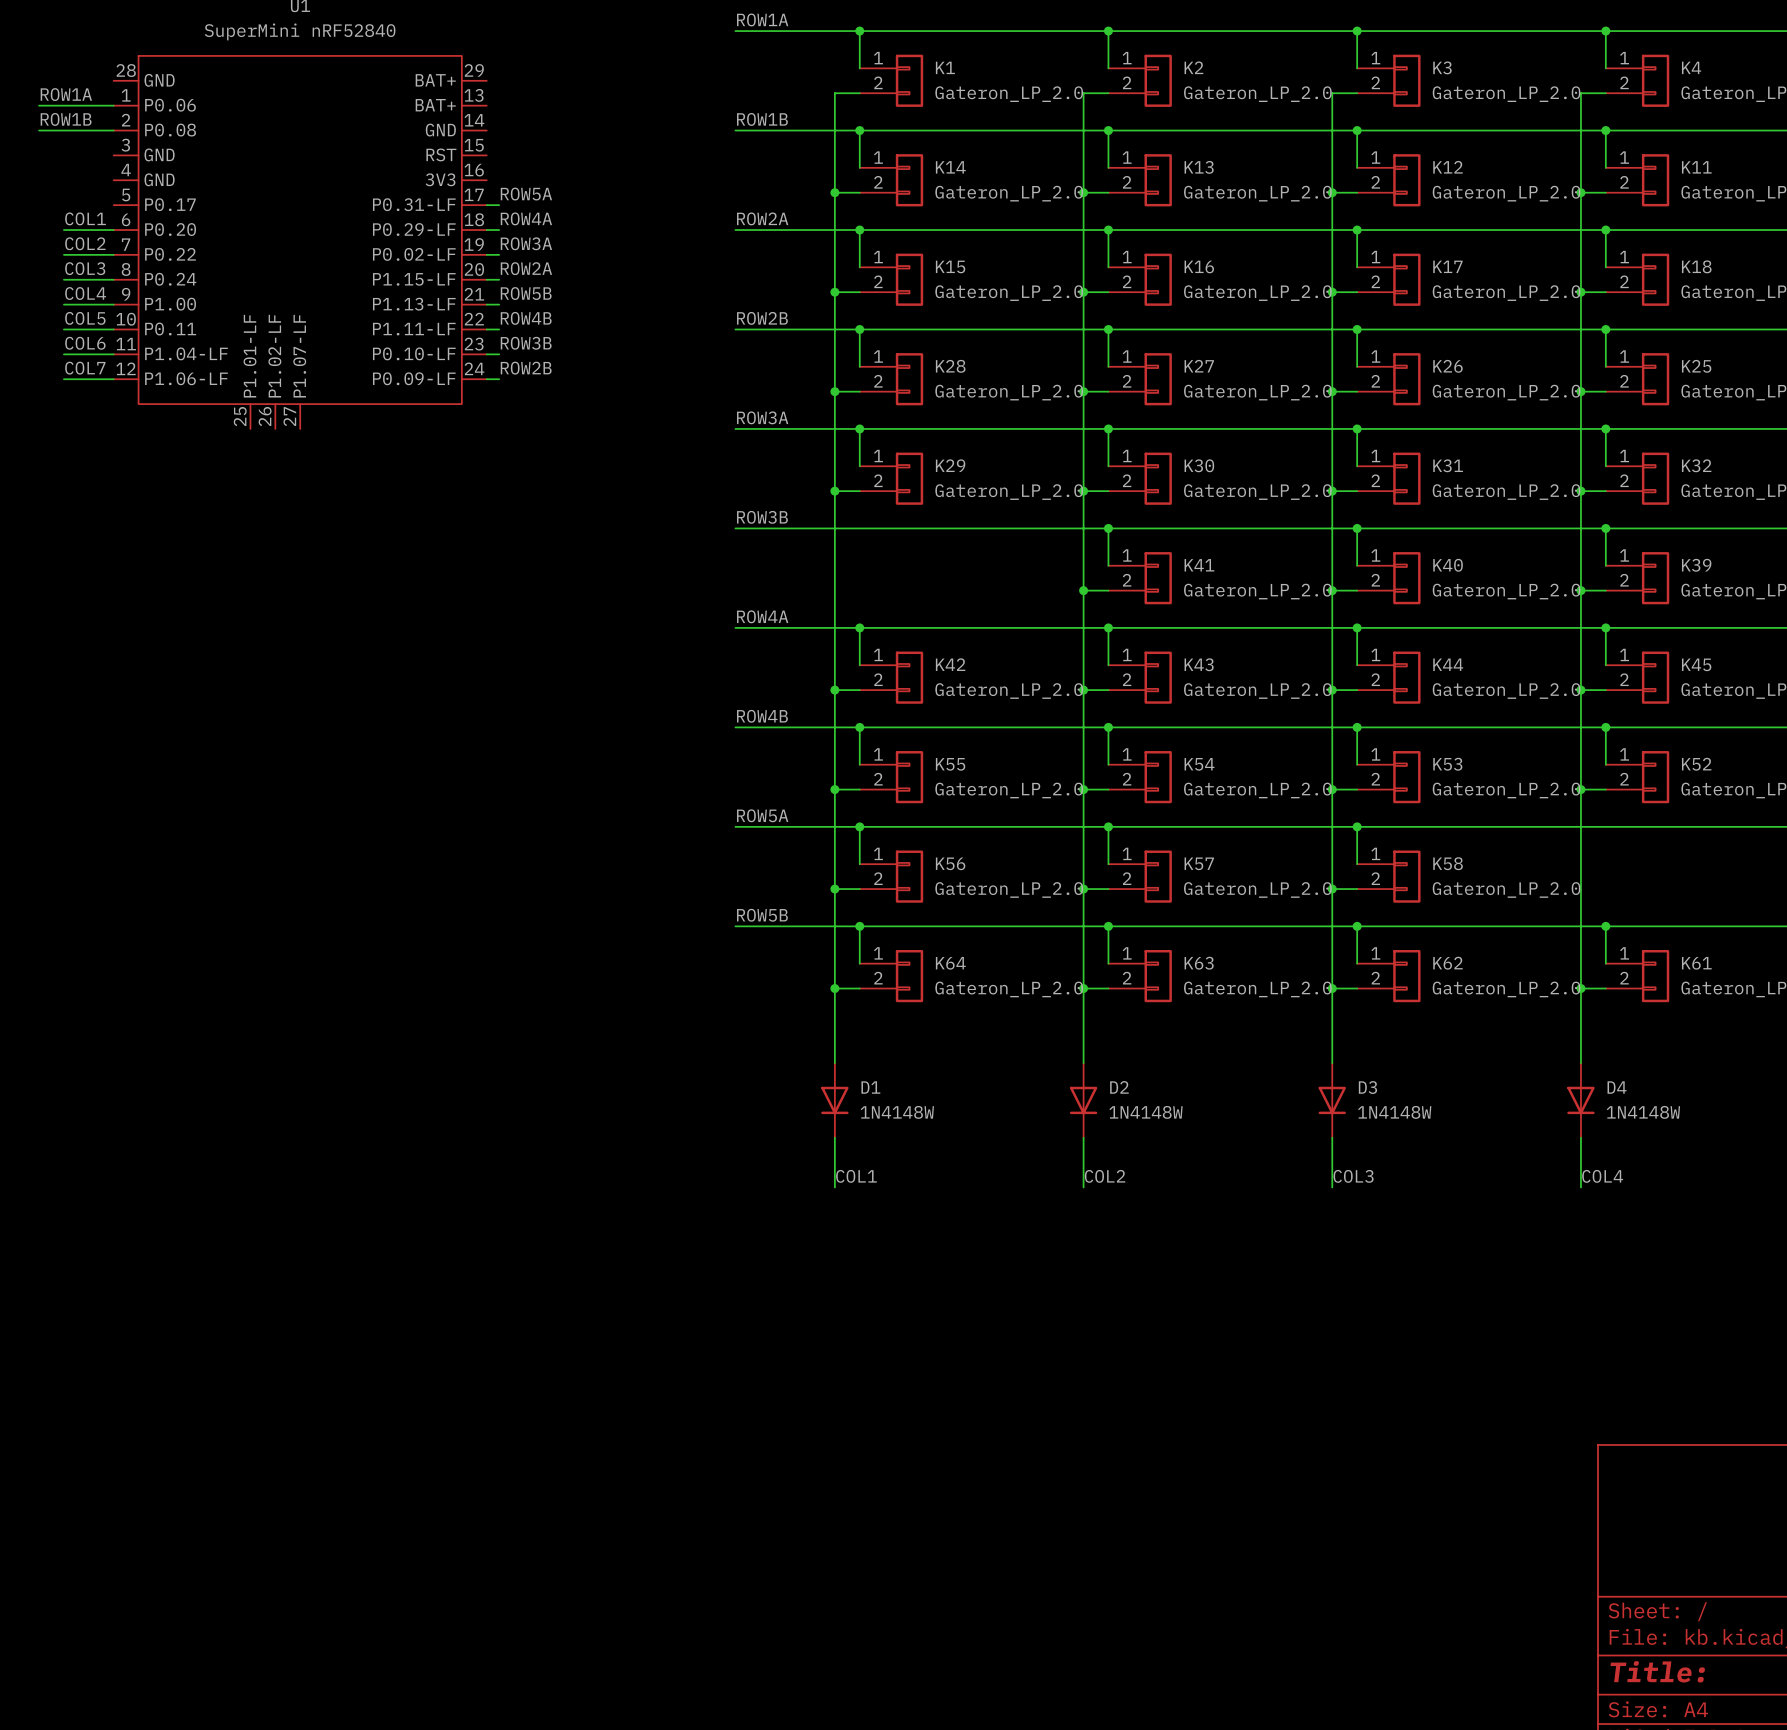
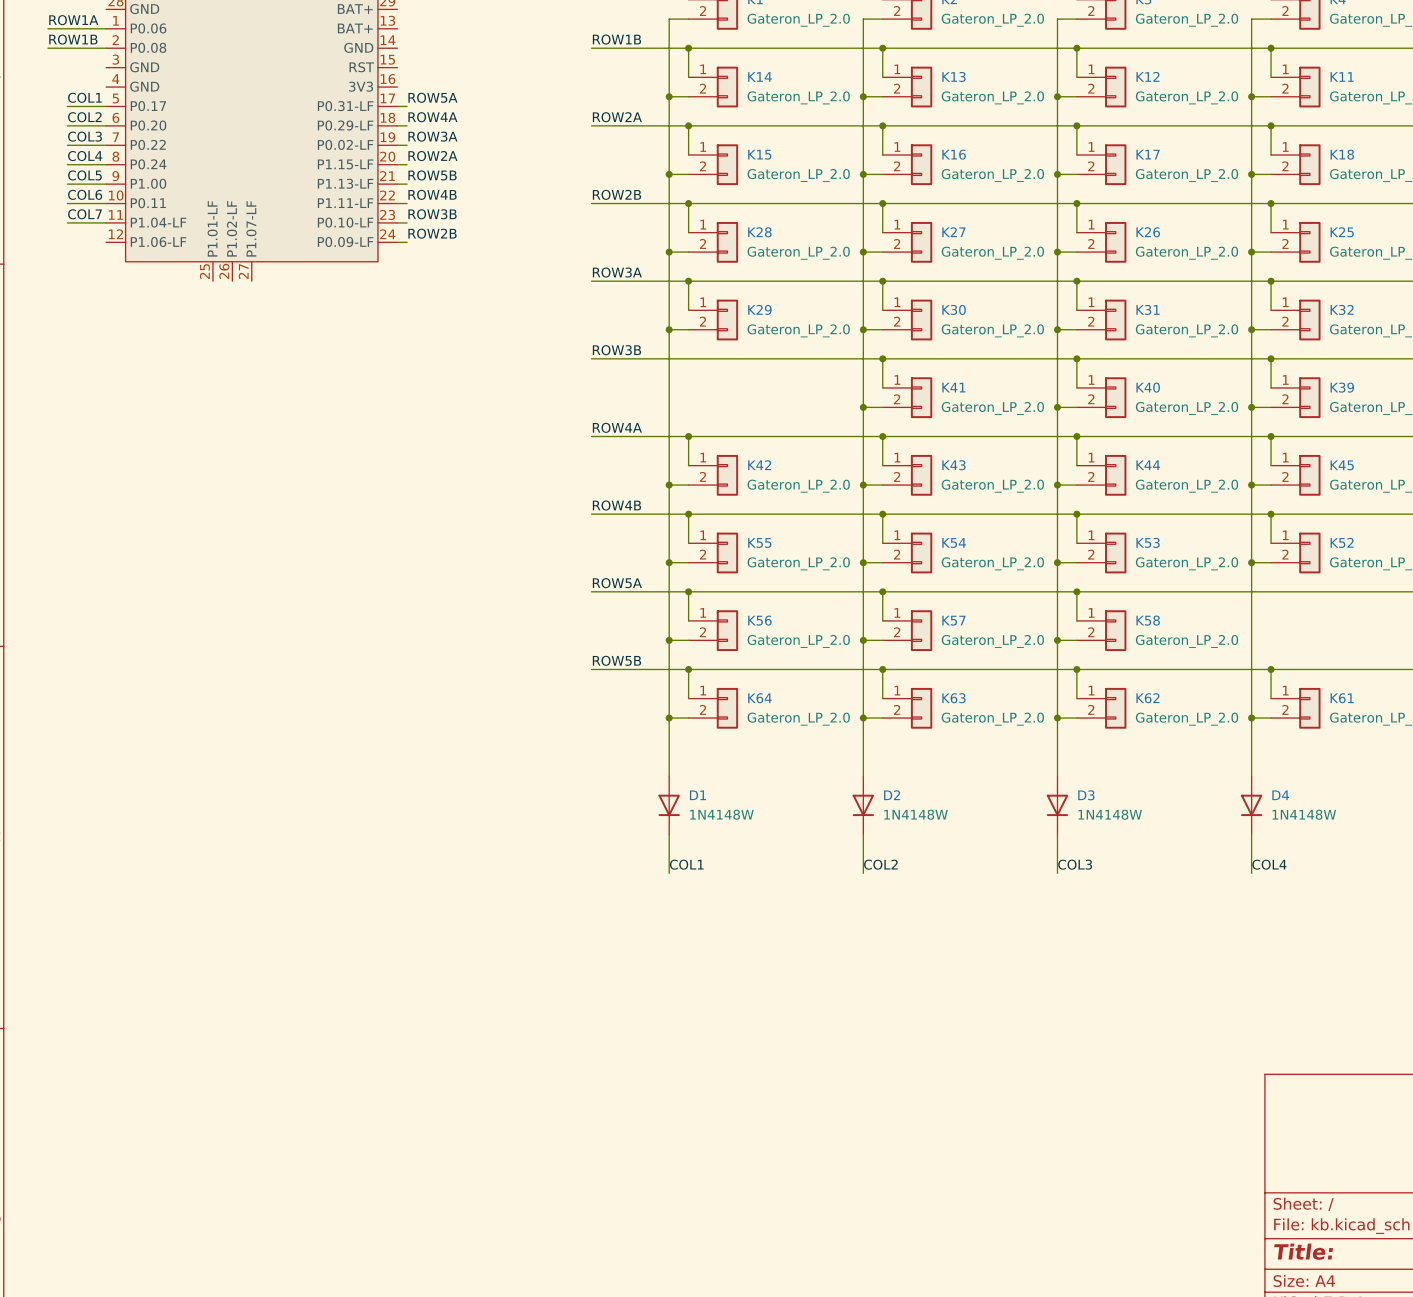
label: none -> COL1 (84, 97)
label: COL1 (85, 218) -> COL2 (84, 117)
label: COL2 (85, 243) -> COL3 (85, 136)
label: COL3 (85, 268) -> COL4 (85, 156)
label: COL4 (85, 293) -> COL5 (84, 175)
label: COL5 (85, 318) -> COL6 (85, 194)
label: COL6 (85, 343) -> COL7 (84, 214)
label: COL7 (85, 368) -> none
wire: (63, 379) (113, 379) -> (67, 106) (106, 106)

